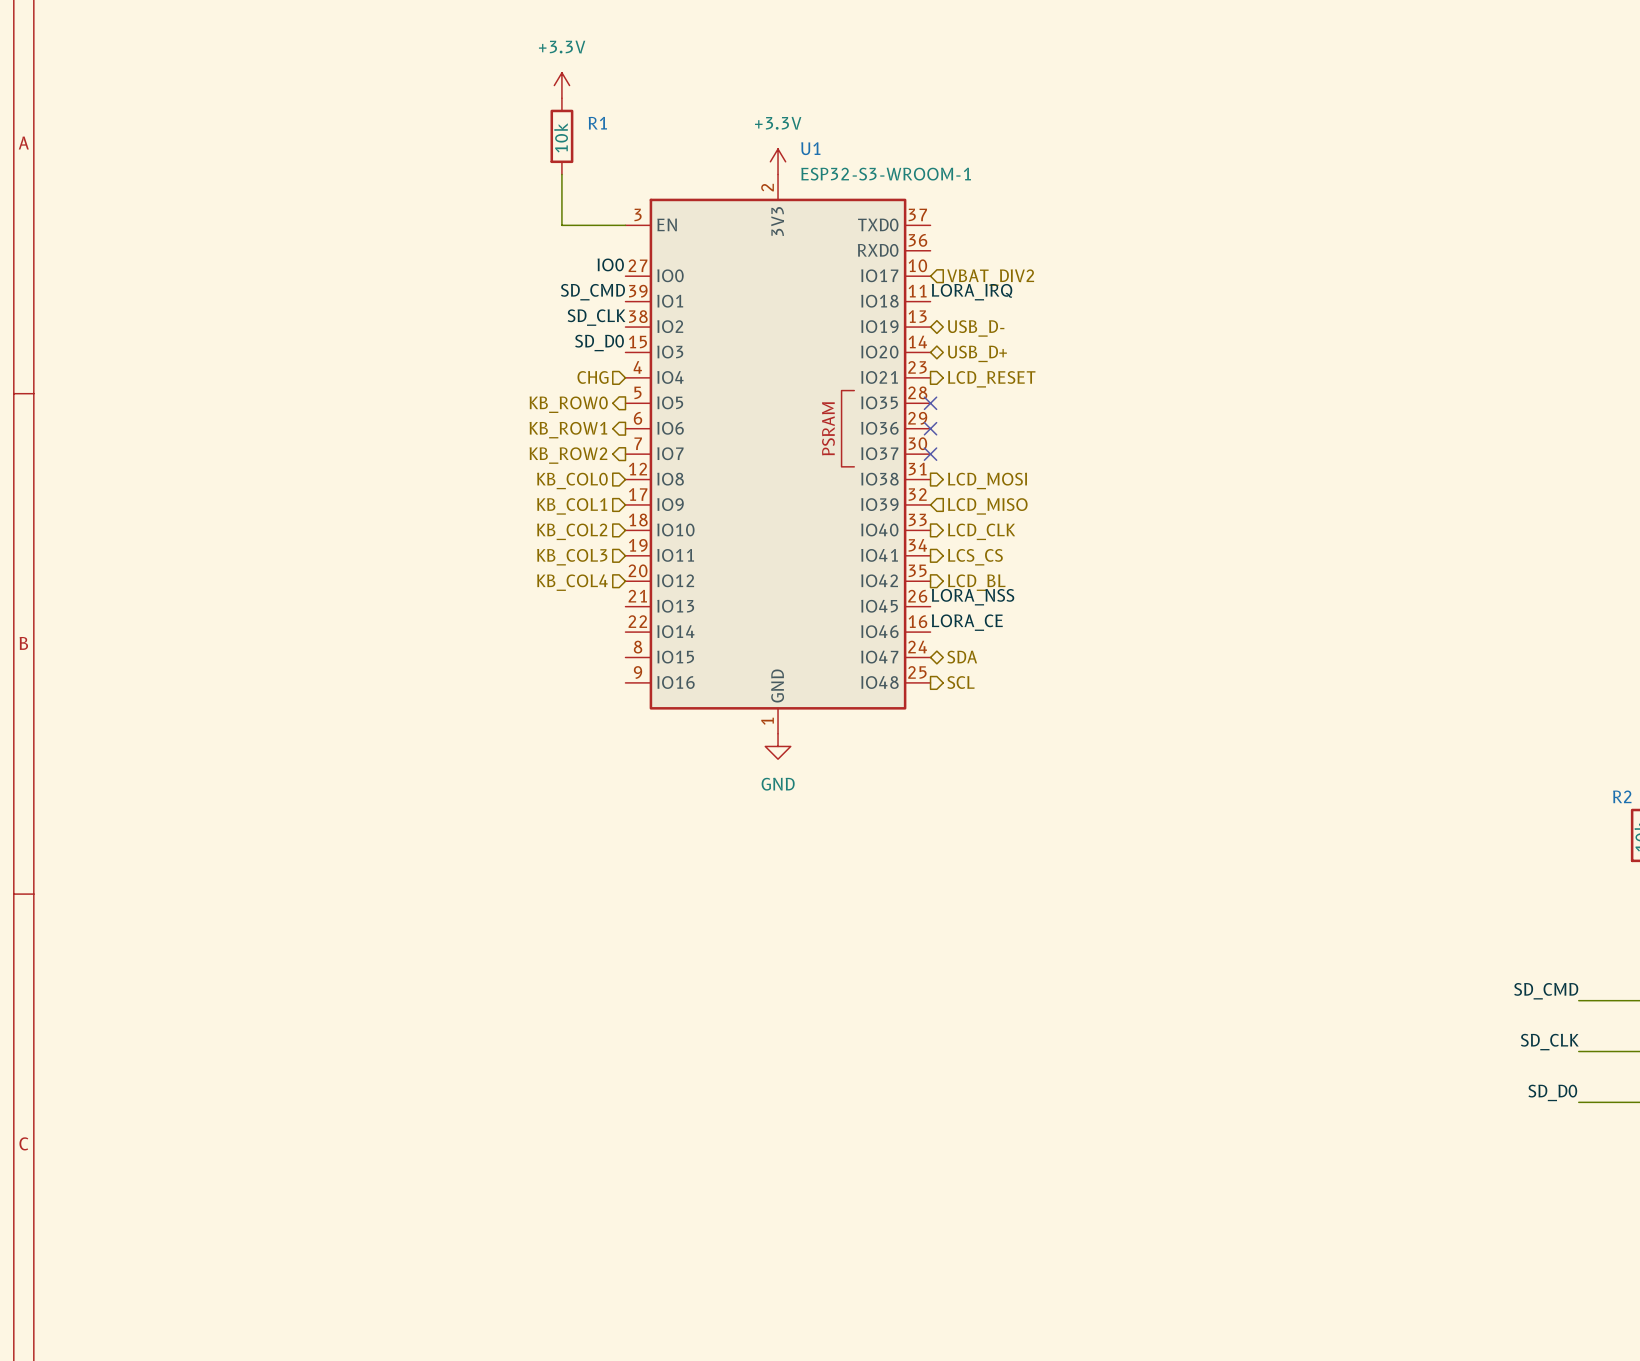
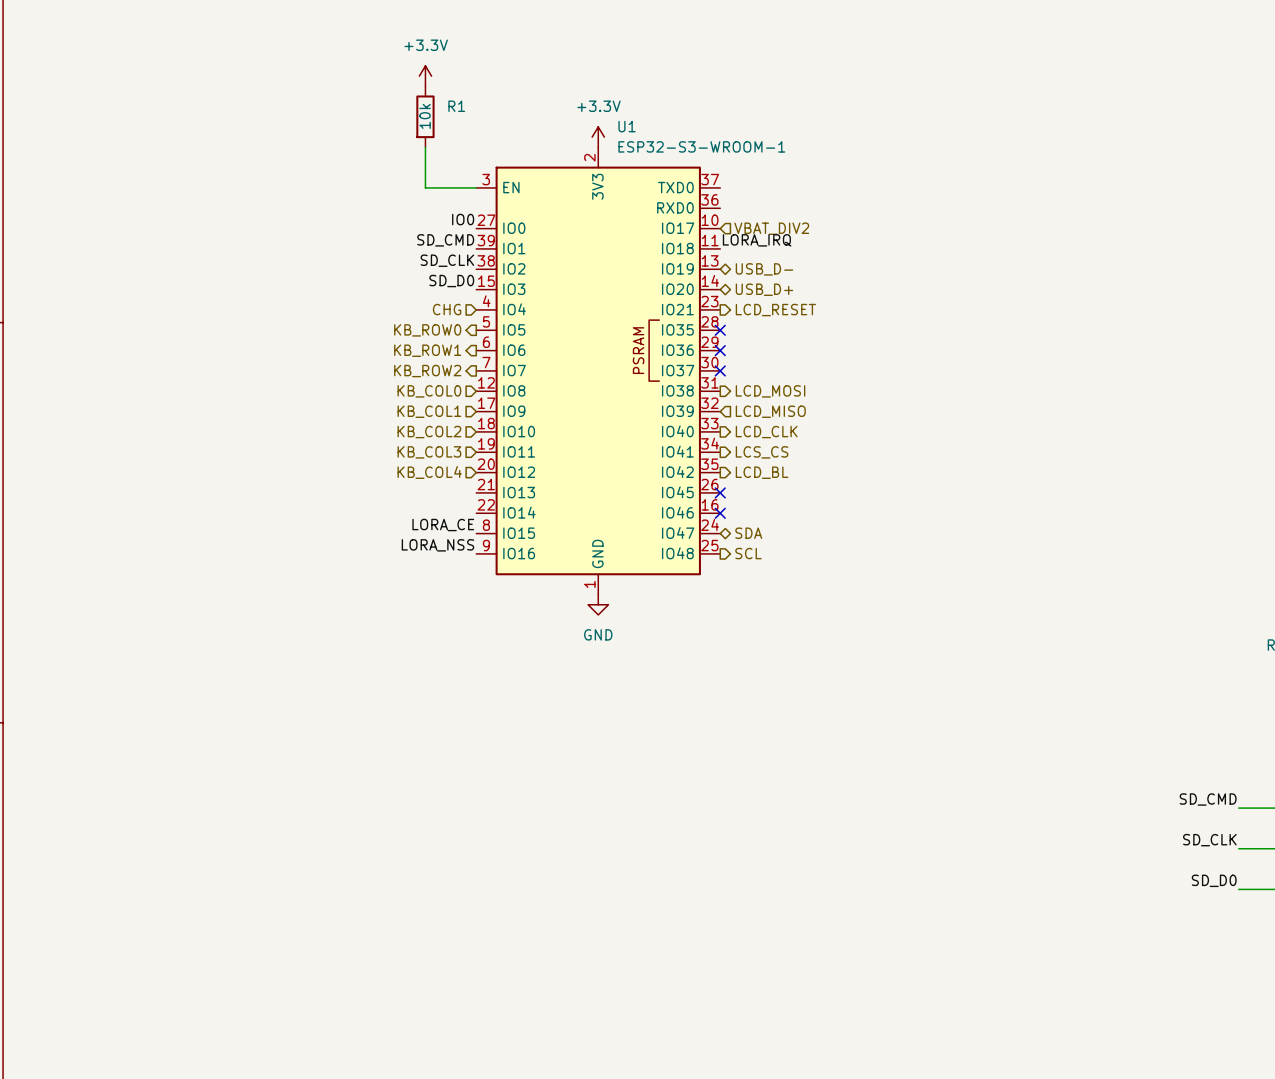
label: LORA_NSS (973, 597) -> none
no-connect mark: none -> (720, 492)
label: LORA_CE (967, 622) -> none
no-connect mark: none -> (720, 513)
label: none -> LORA_CE (443, 525)
label: none -> LORA_NSS (437, 545)

